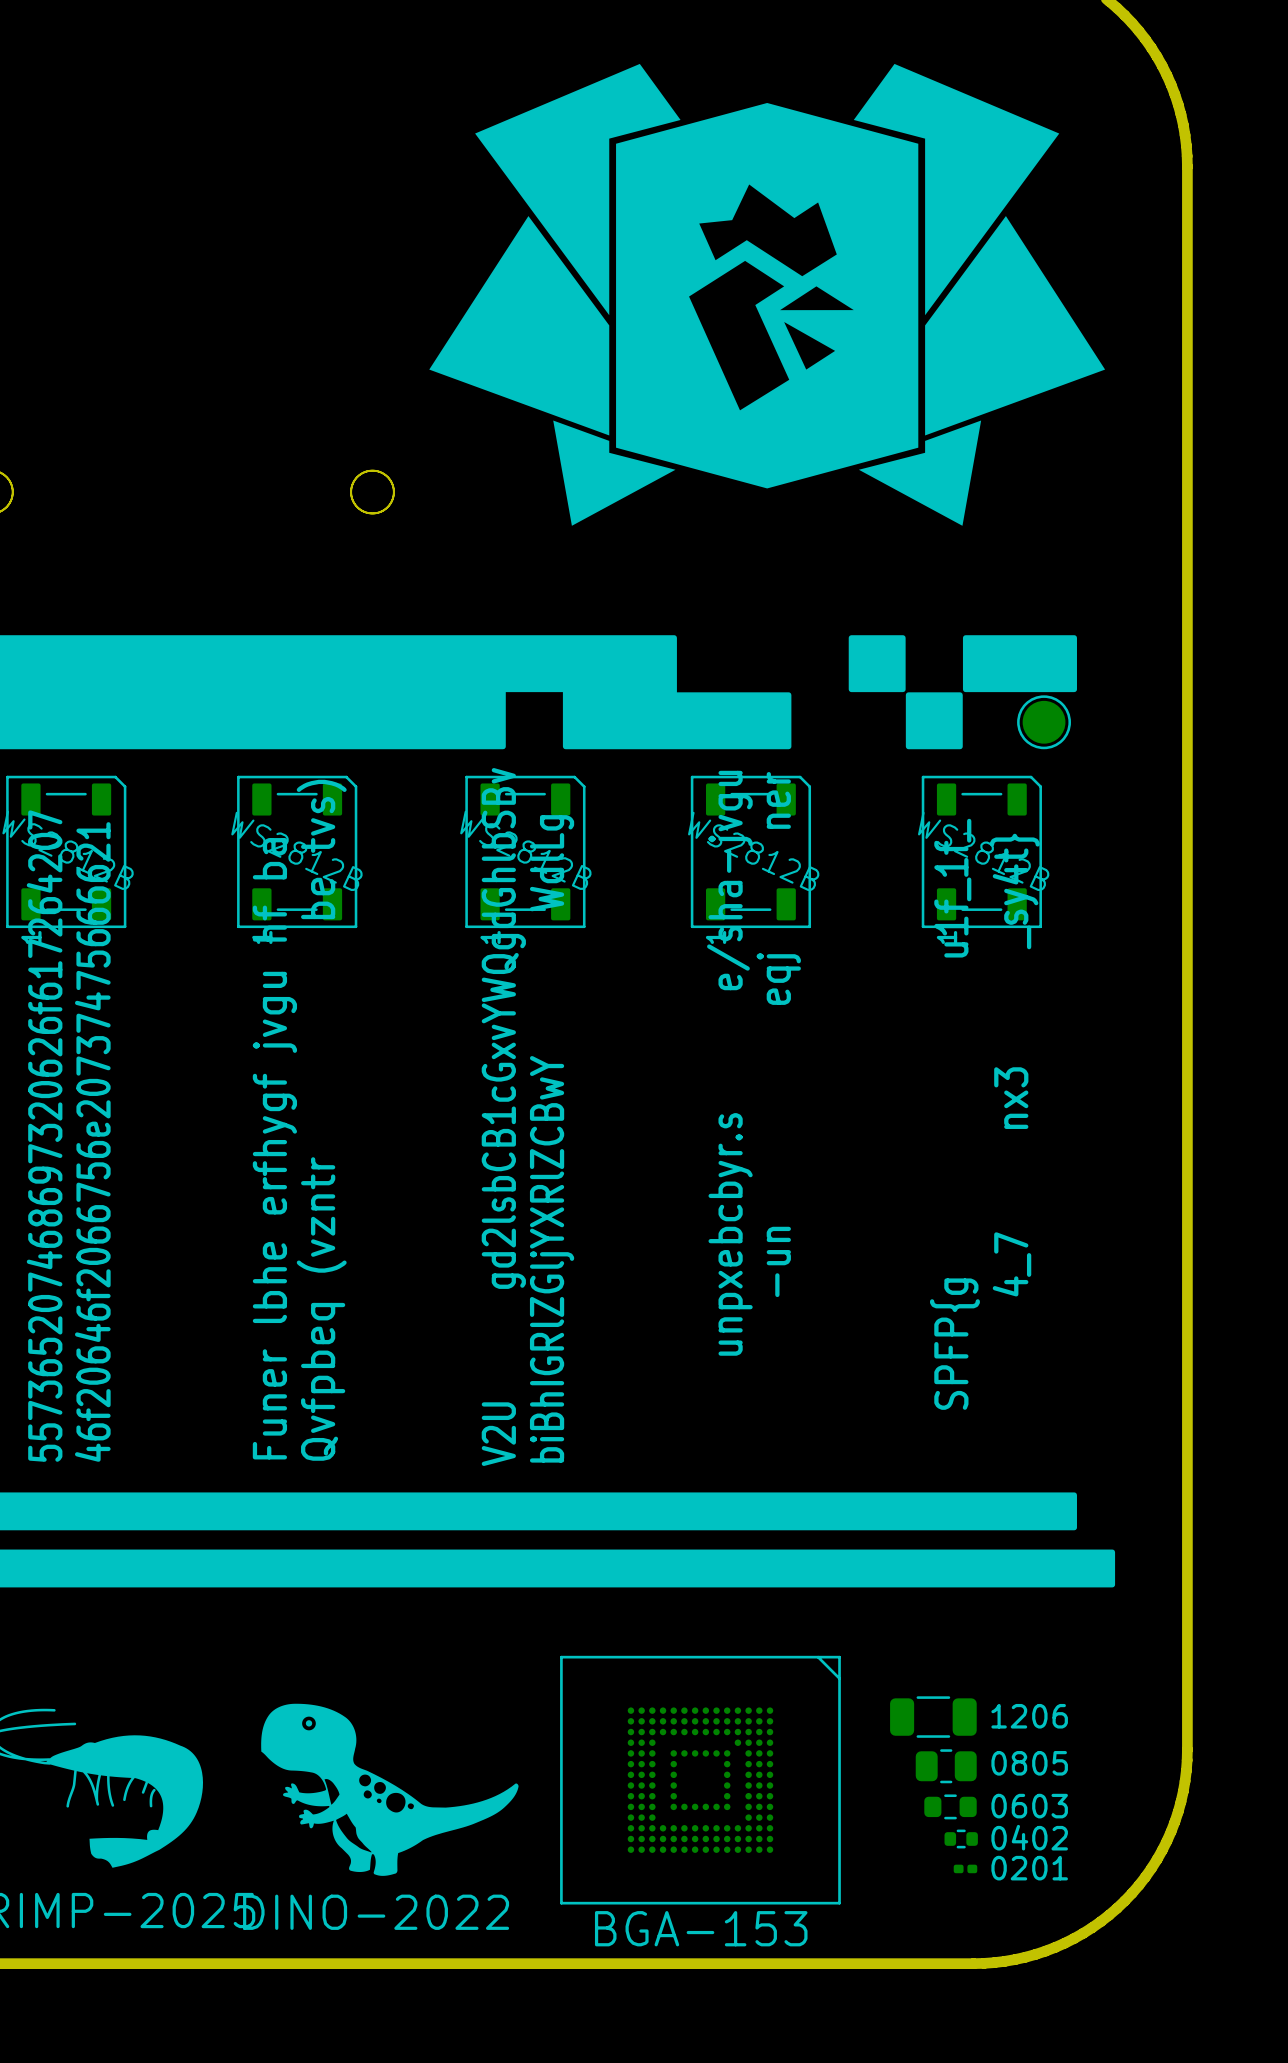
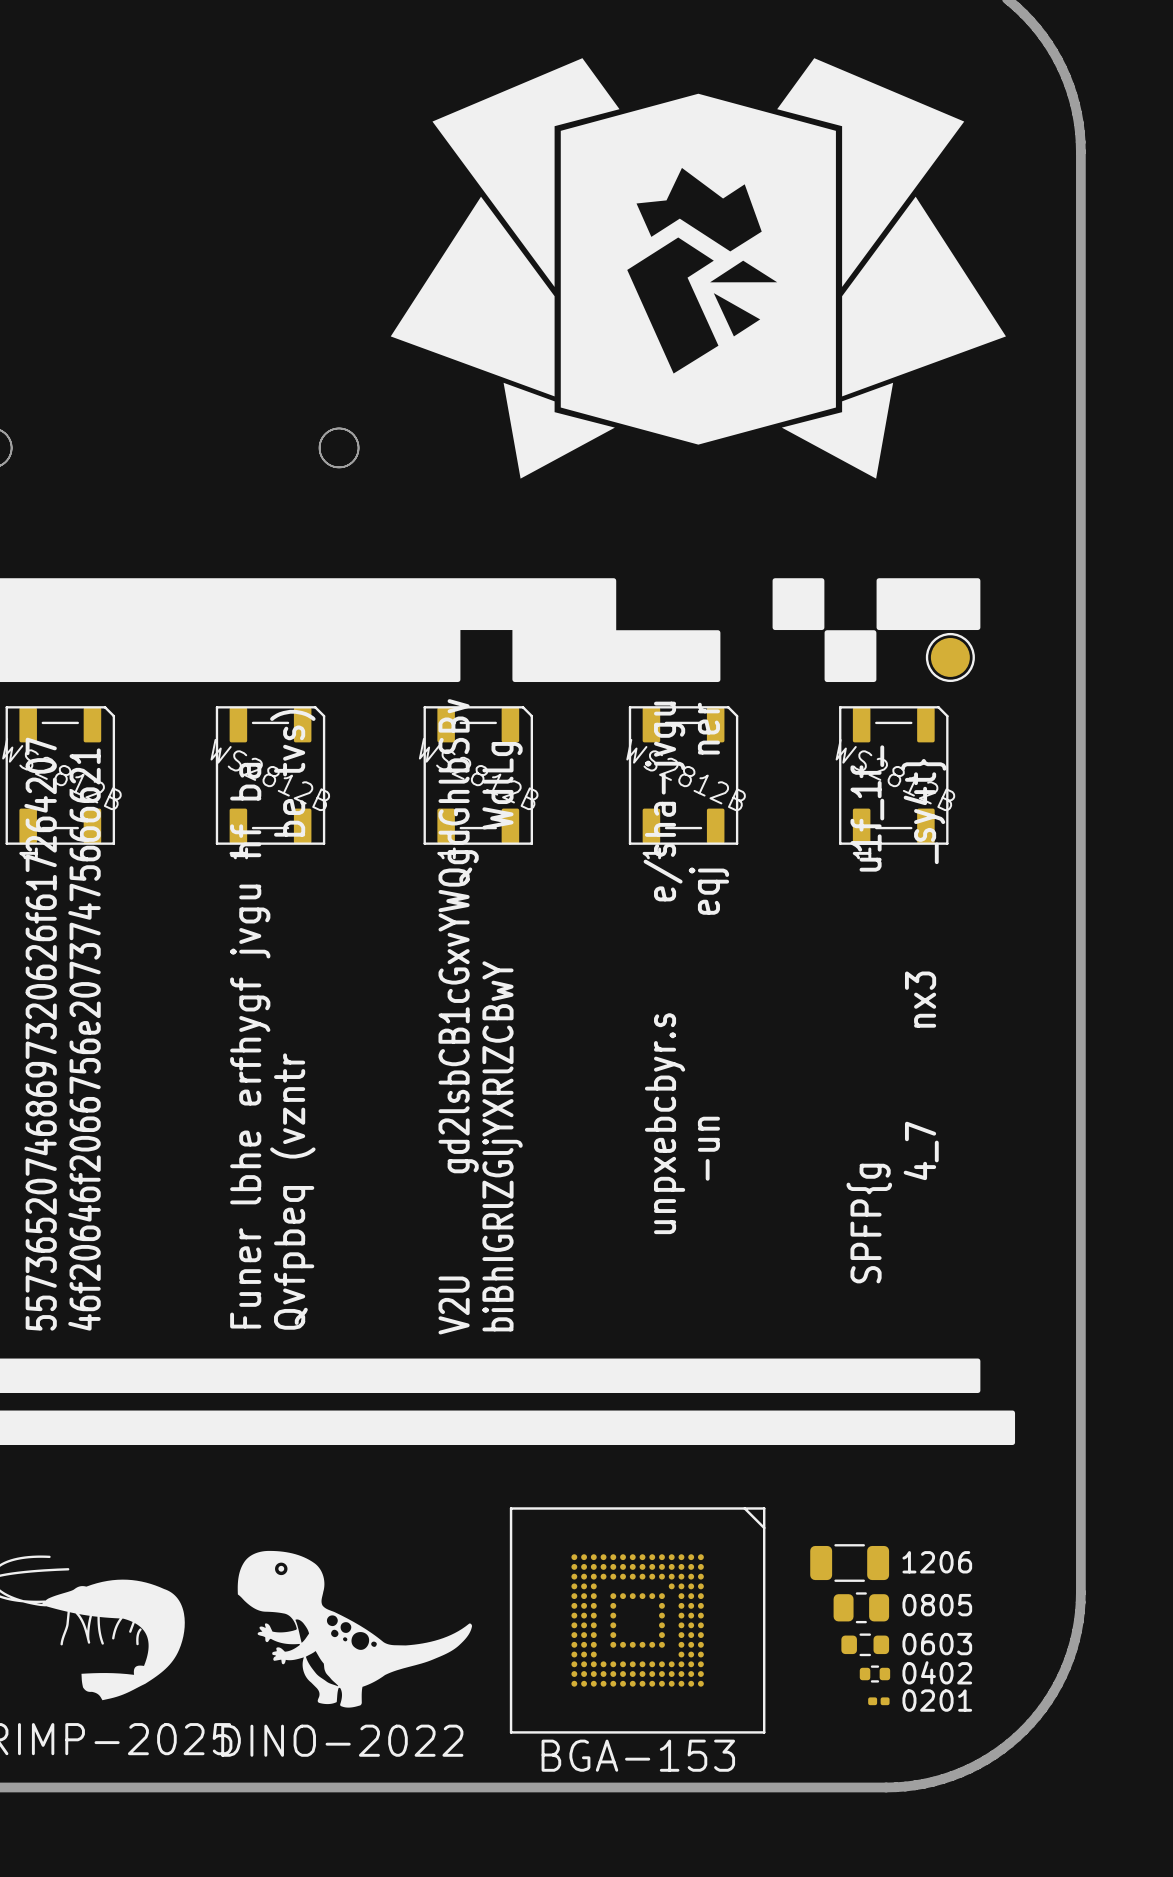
part footprint: [6, 775, 127, 929] -> [5, 706, 116, 845]
part footprint: [237, 775, 358, 929] -> [215, 706, 326, 845]
part footprint: [465, 775, 586, 929] -> [423, 706, 533, 845]
part footprint: [690, 775, 812, 929] -> [628, 706, 739, 845]
part footprint: [921, 775, 1042, 929] -> [839, 706, 949, 845]

